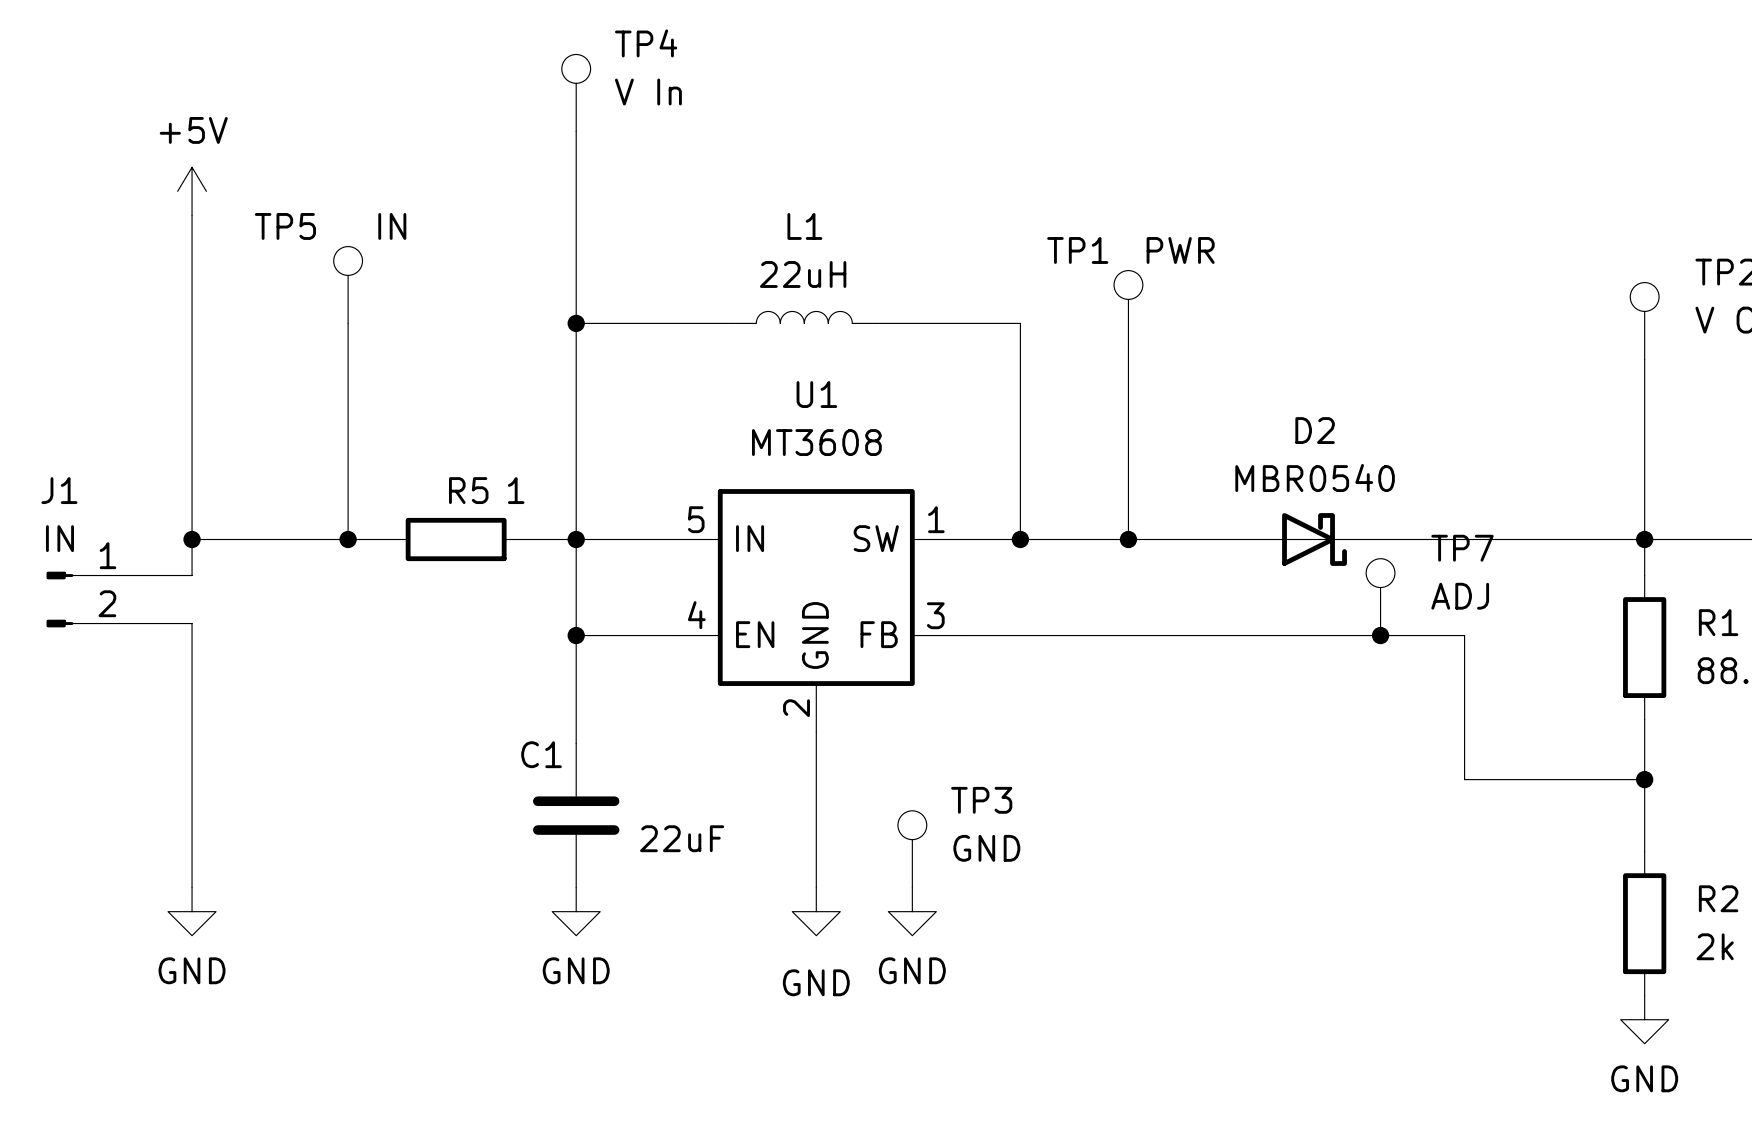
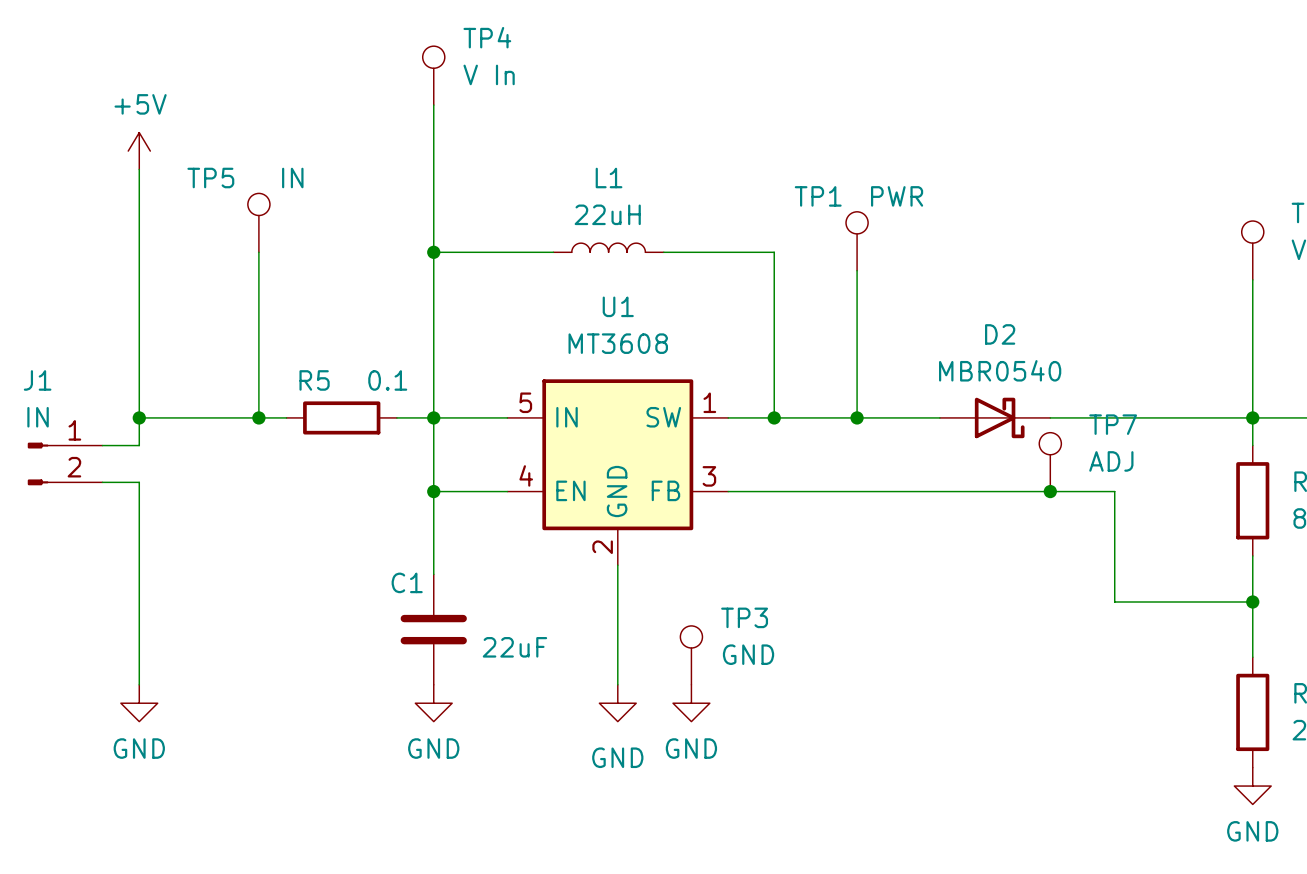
R5 name position: R5 (468, 490) -> R5 (314, 380)
R5 value: 1 (516, 490) -> 0.1 (387, 380)

